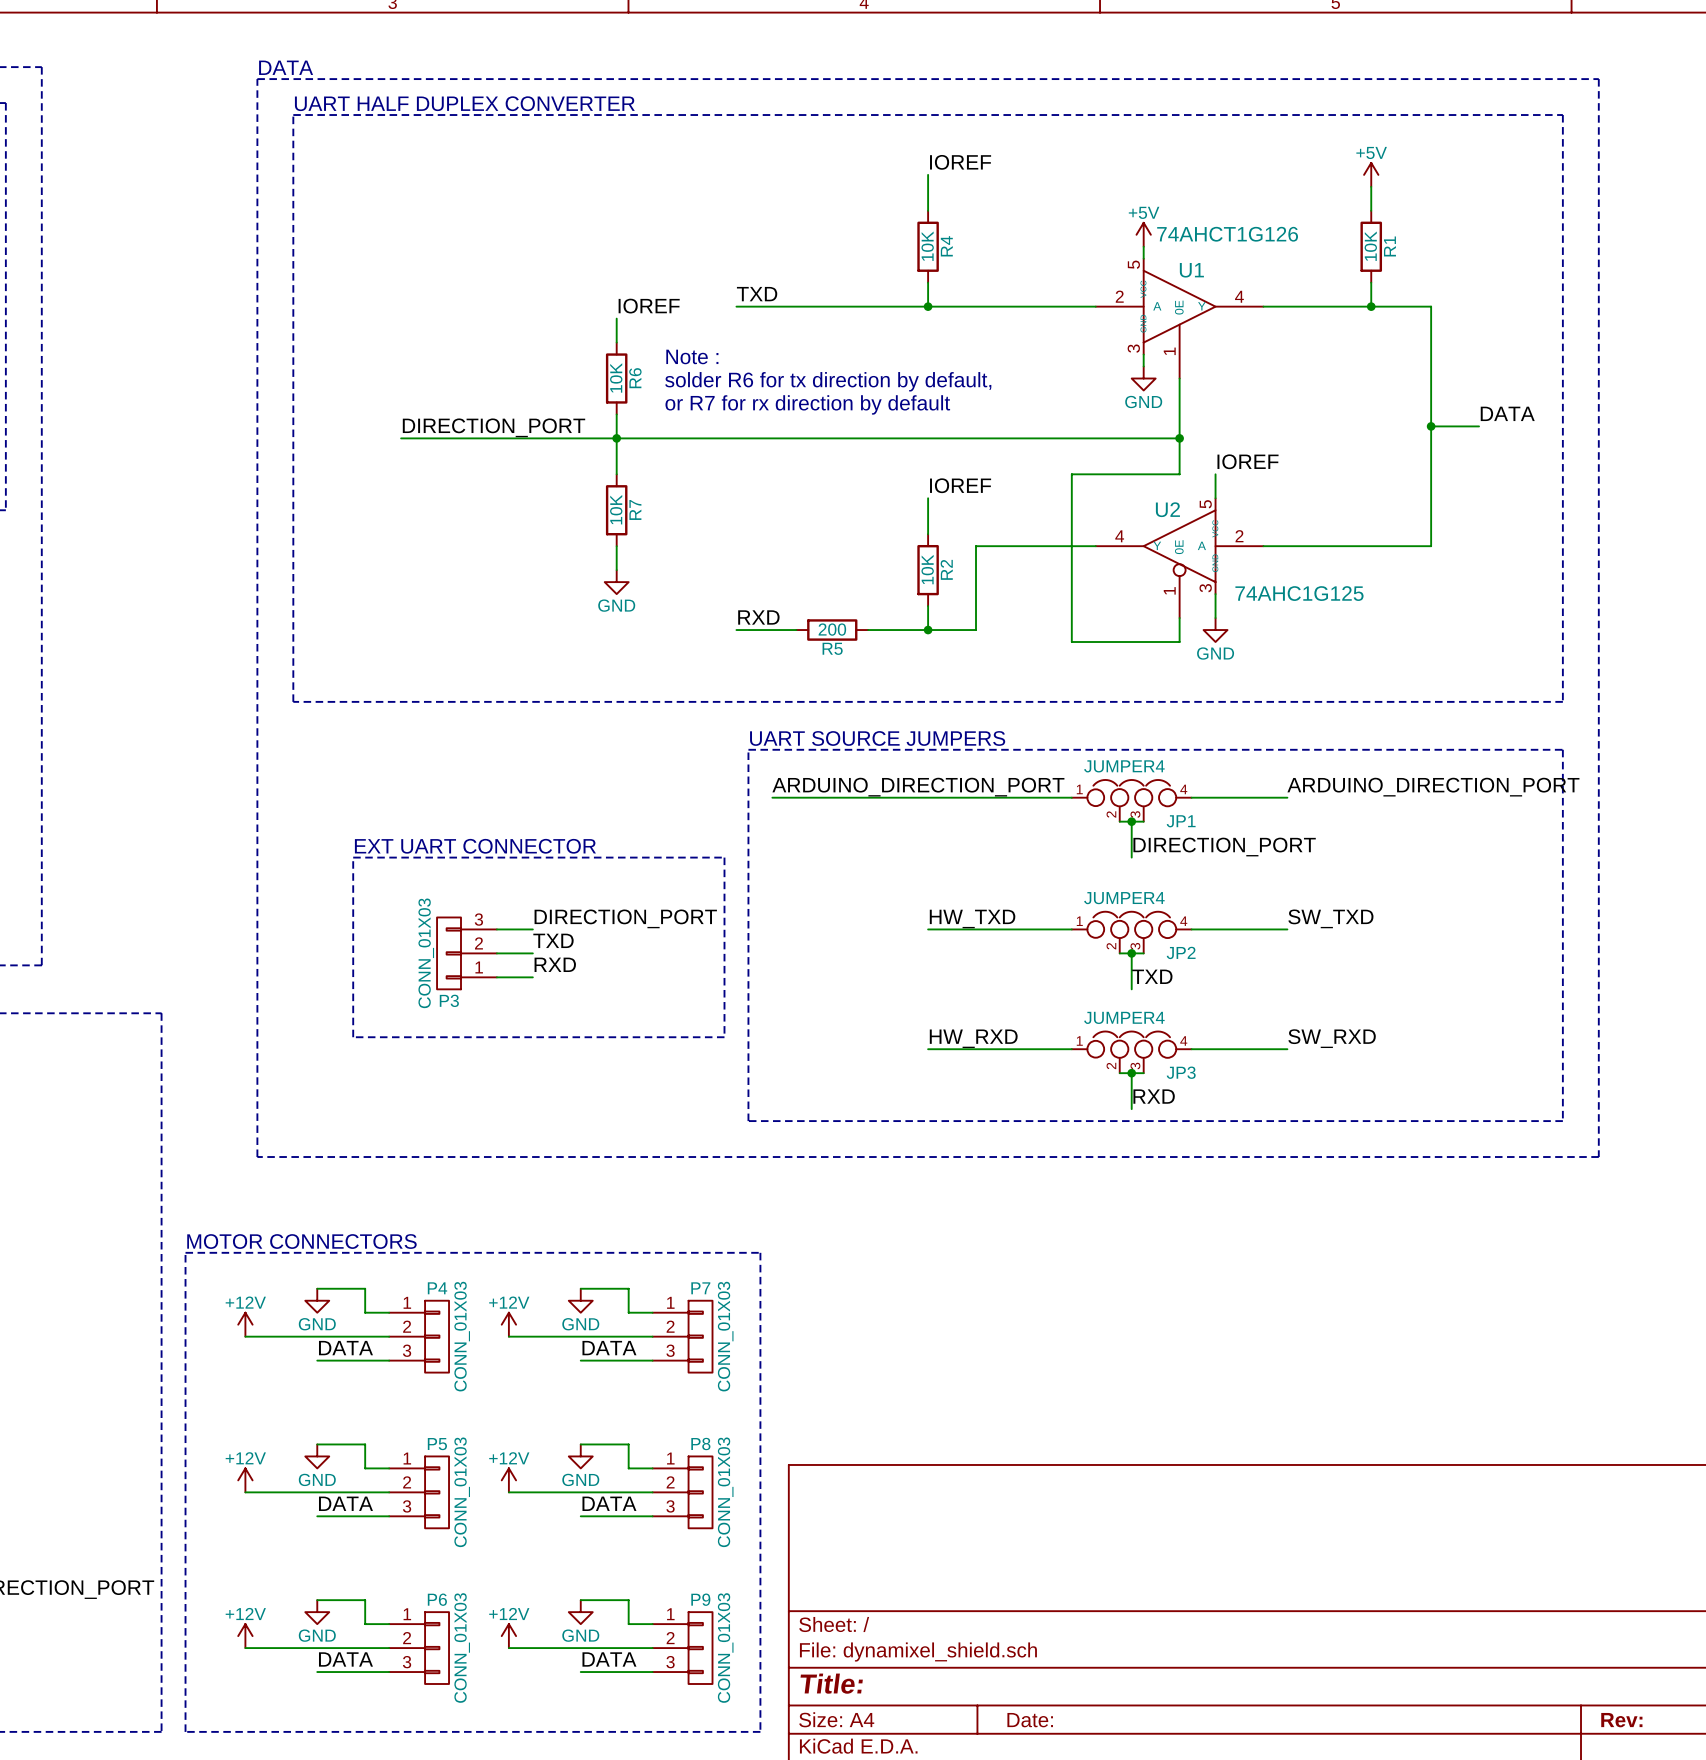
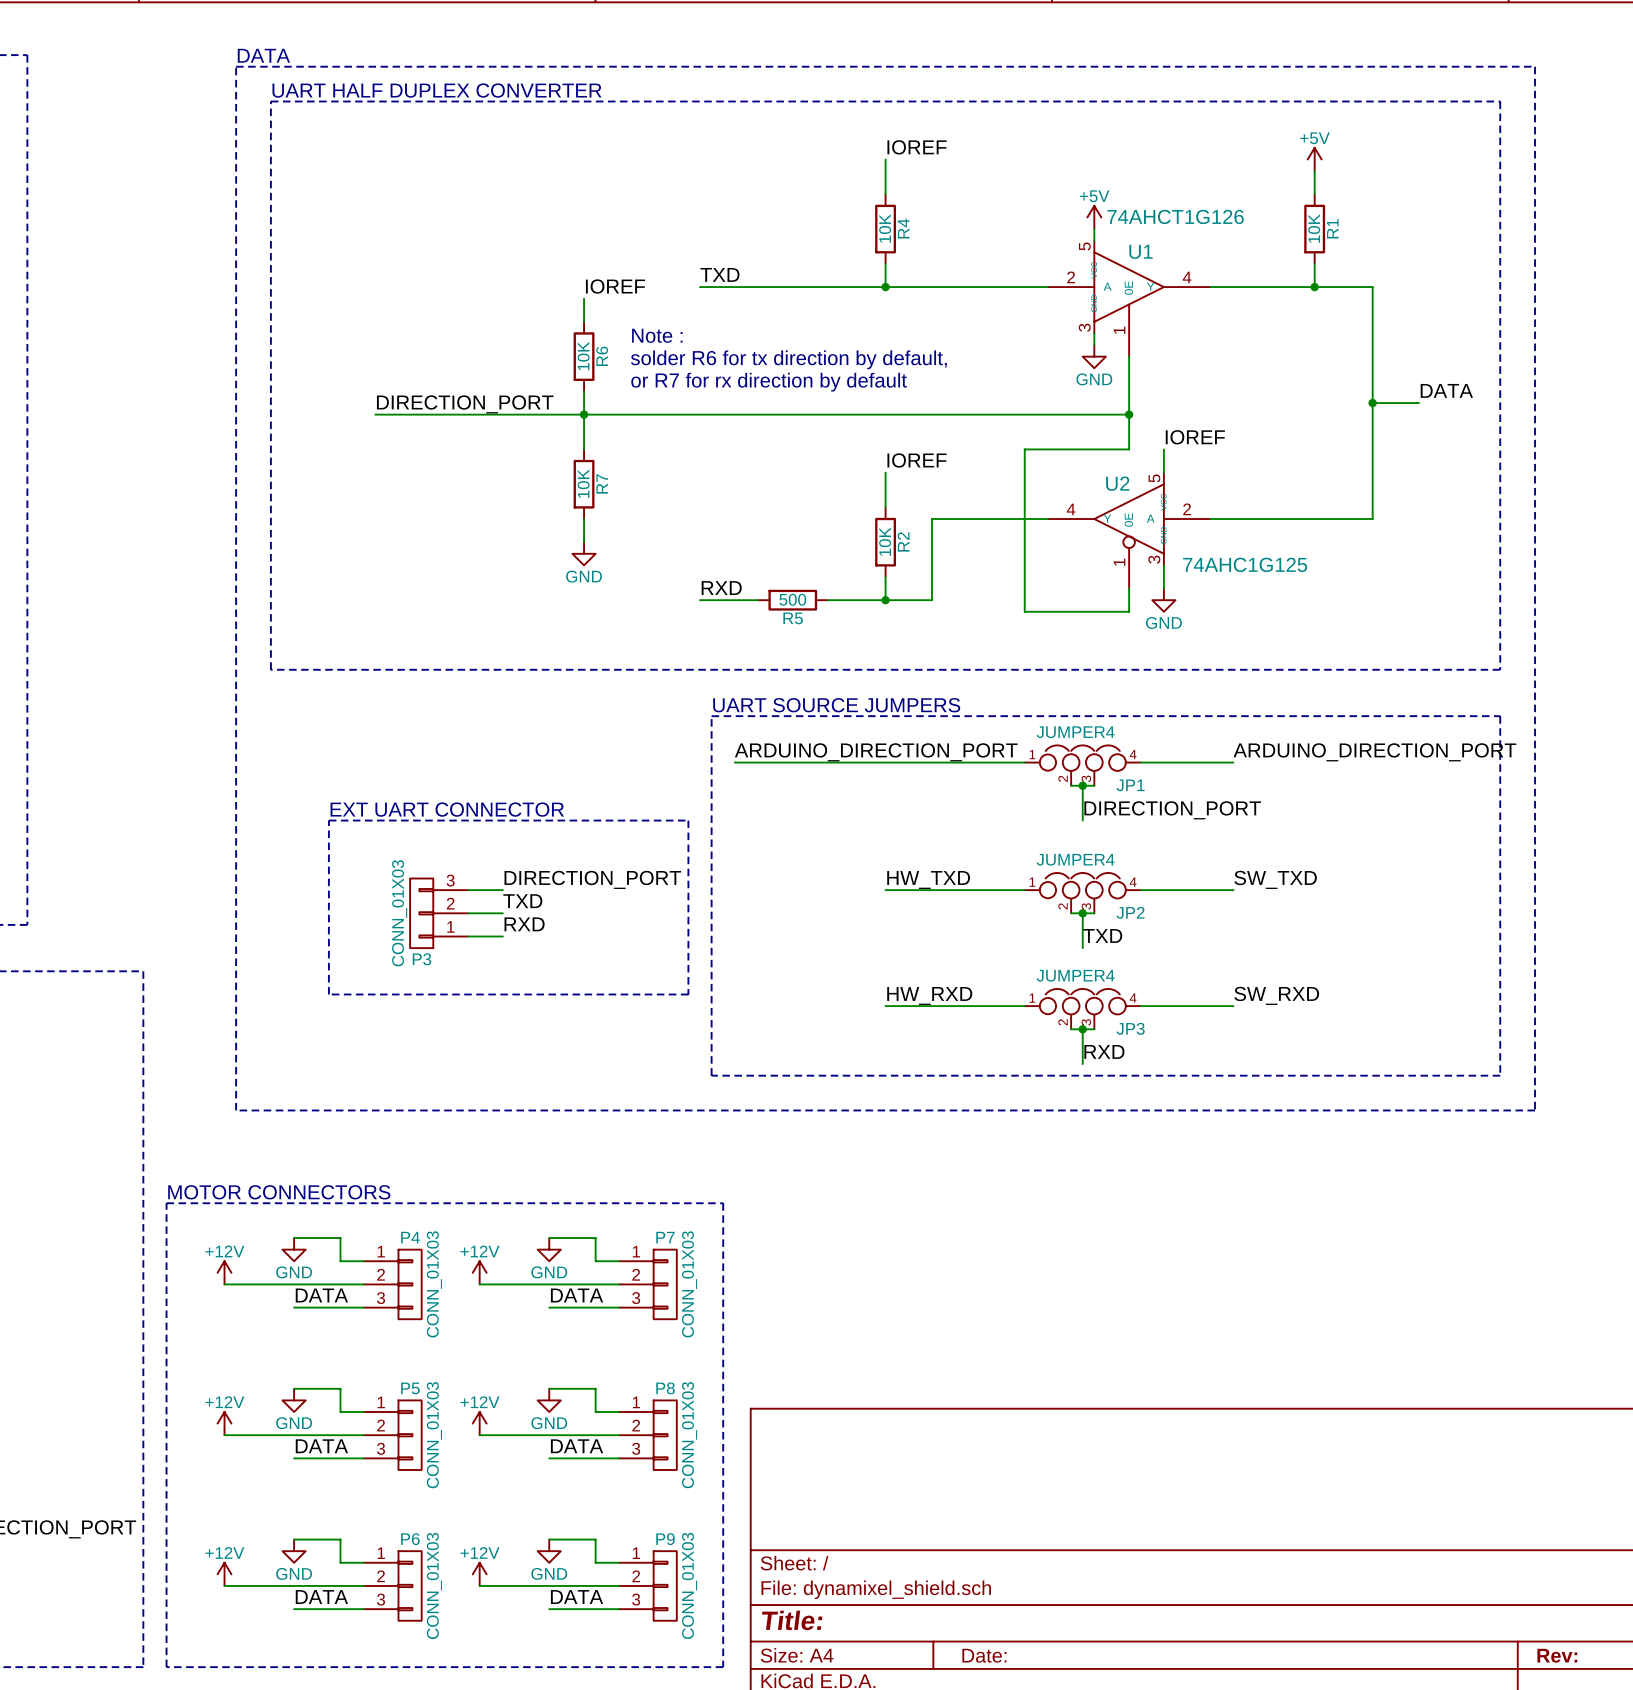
R5 value: 200 (832, 629) -> 500 (792, 599)

